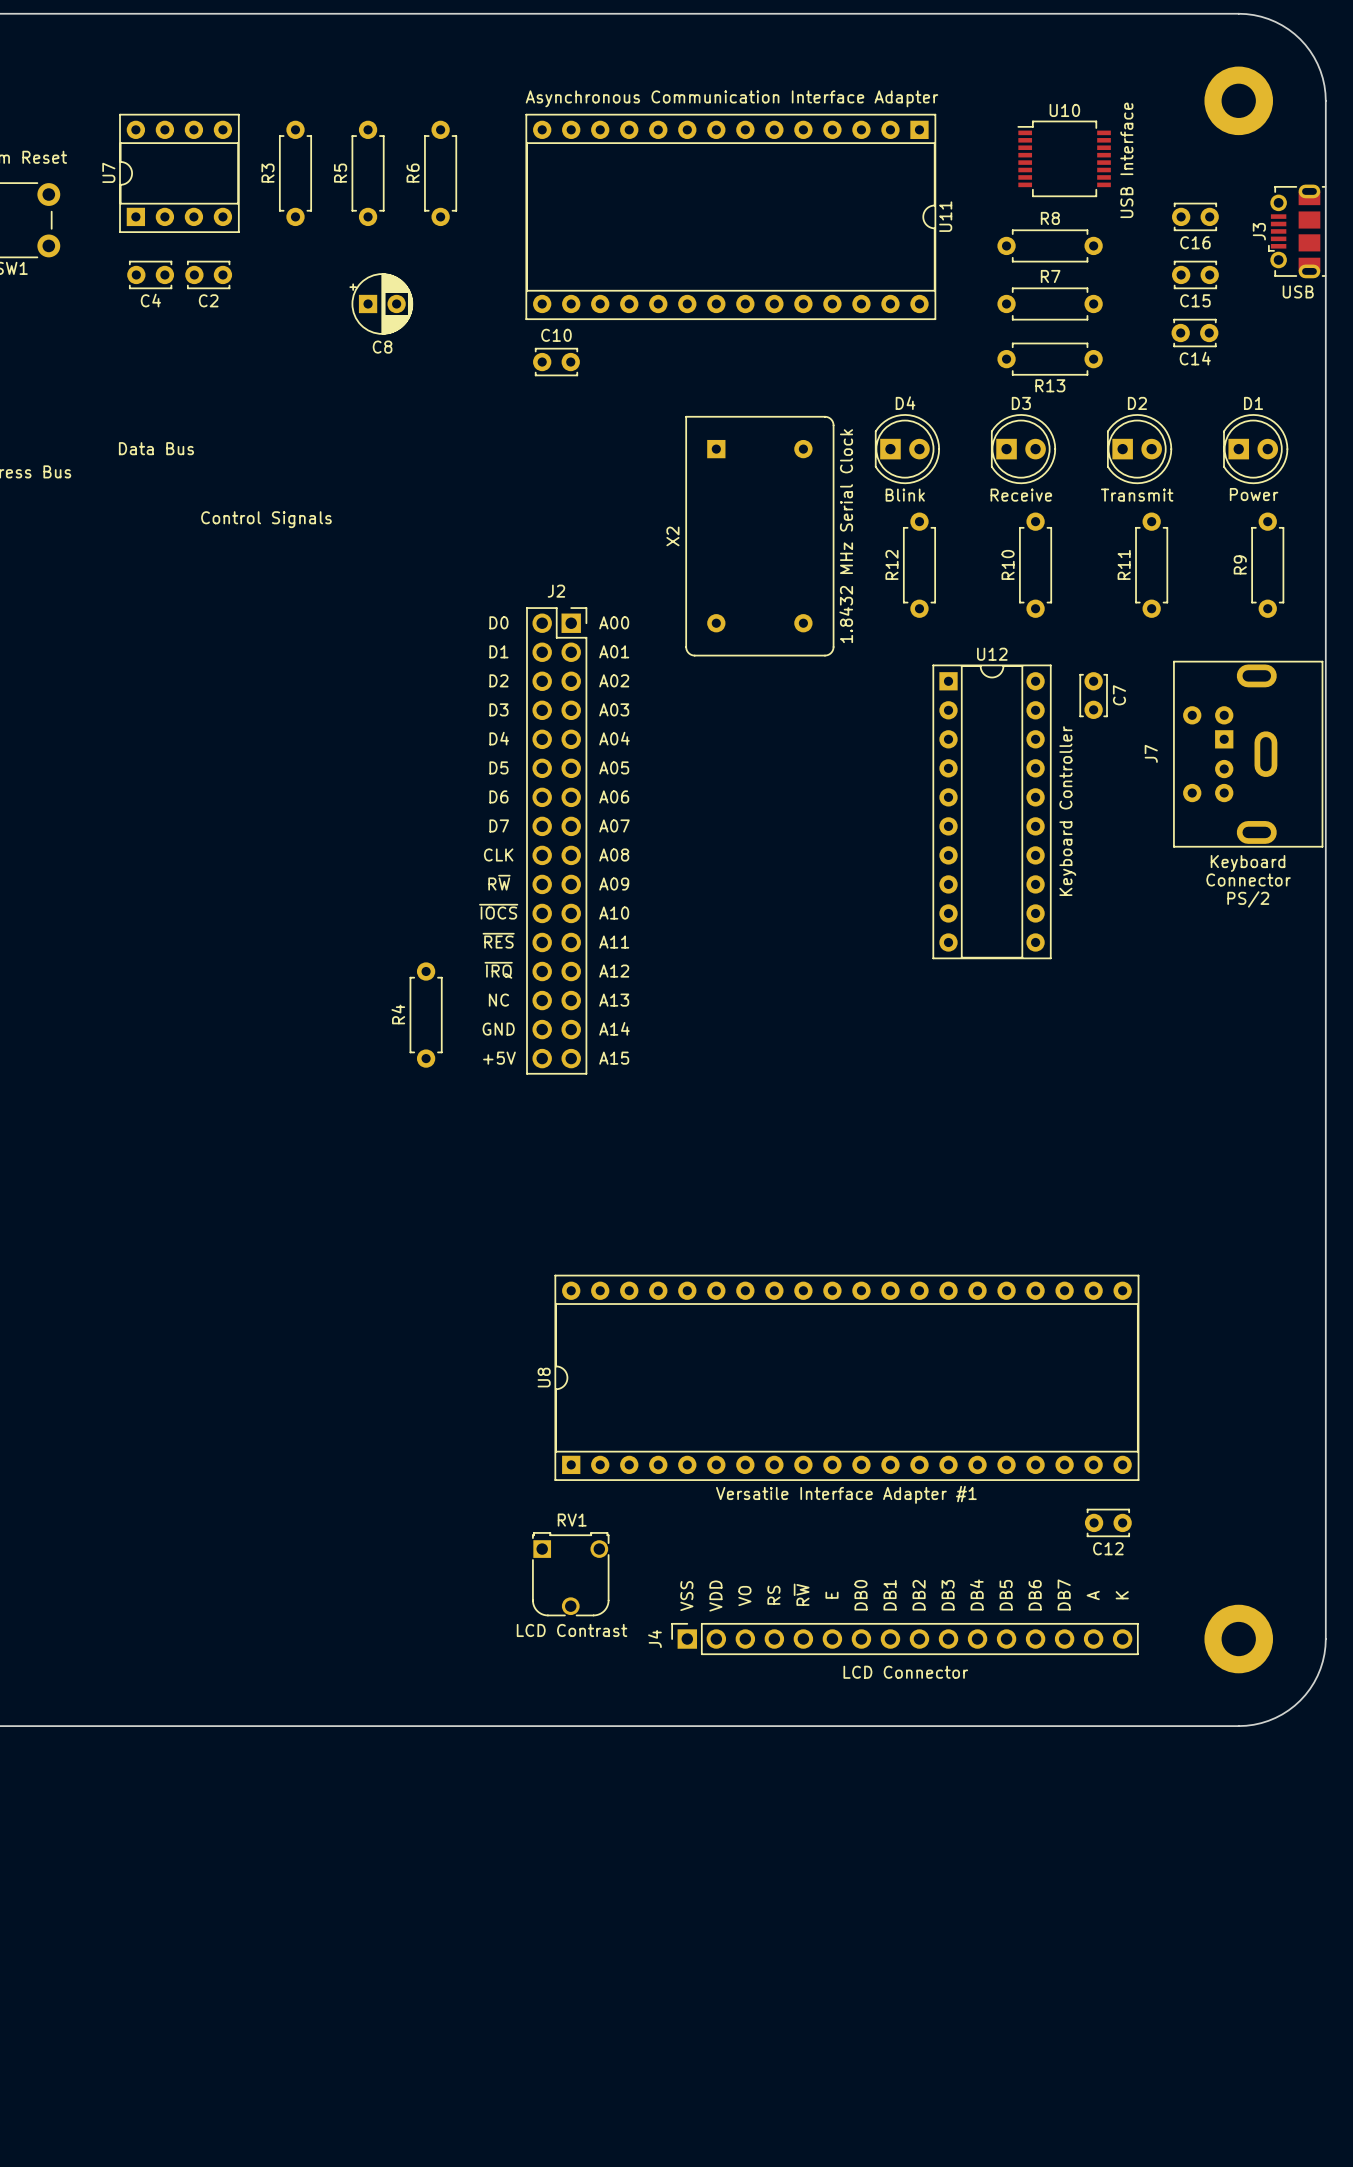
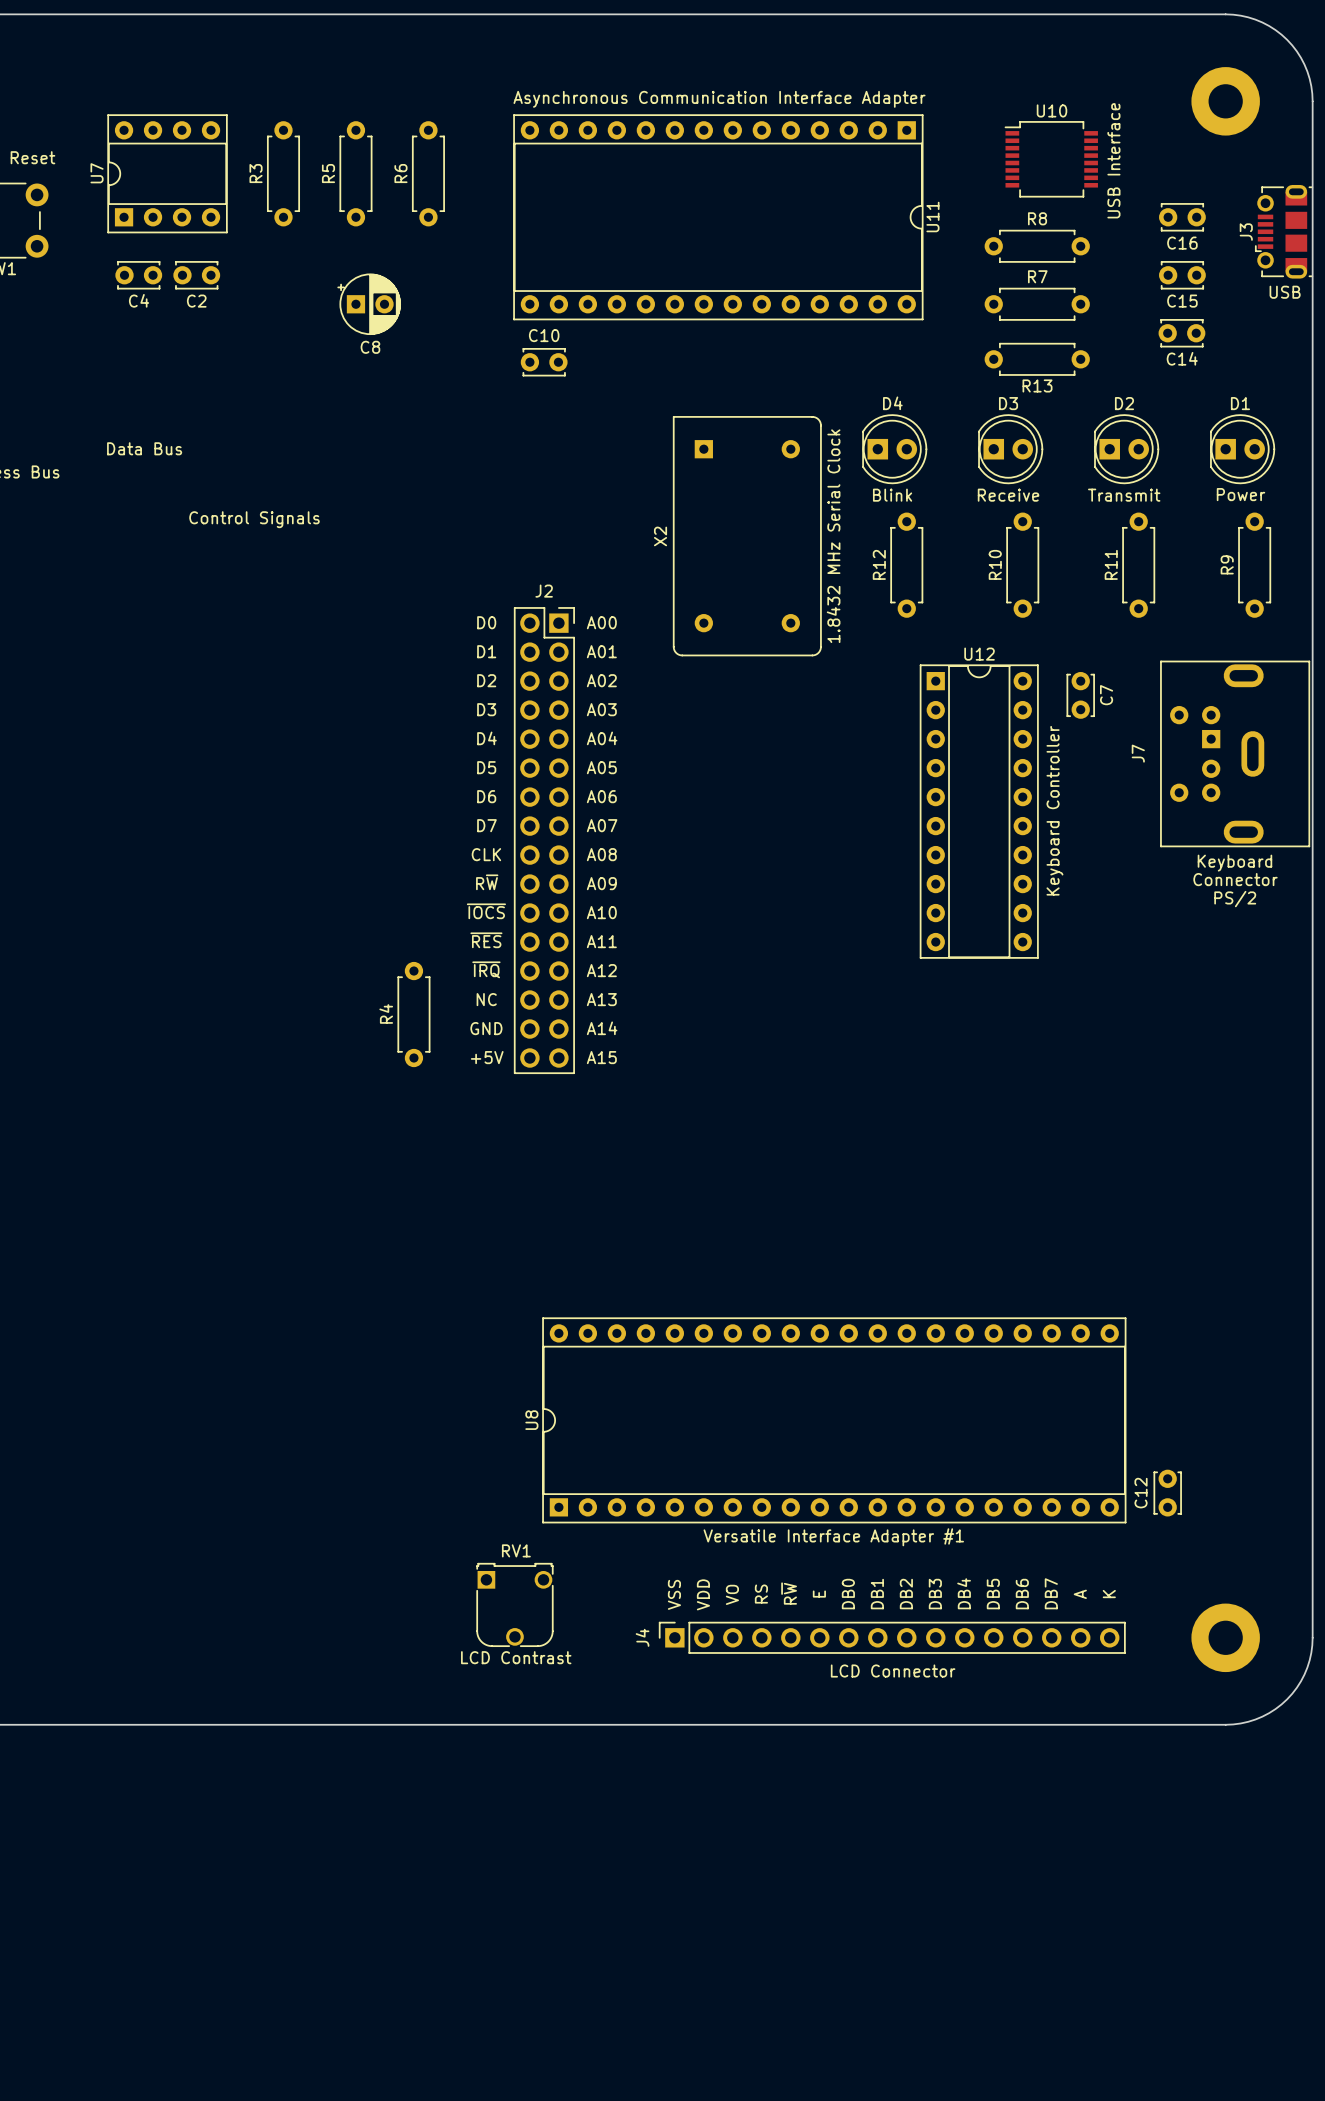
U8 position: (846, 1377) -> (834, 1420)
text position: Versatile Interface Adapter #1 (846, 1494) -> Versatile Interface Adapter #1 (833, 1537)
C12 rotation: 0° (1108, 1522) -> 90° clockwise (1167, 1493)
C12 position: (1108, 1522) -> (1167, 1493)
RV1 position: (570, 1574) -> (514, 1604)
text position: LCD Contrast (572, 1630) -> LCD Contrast (516, 1657)

